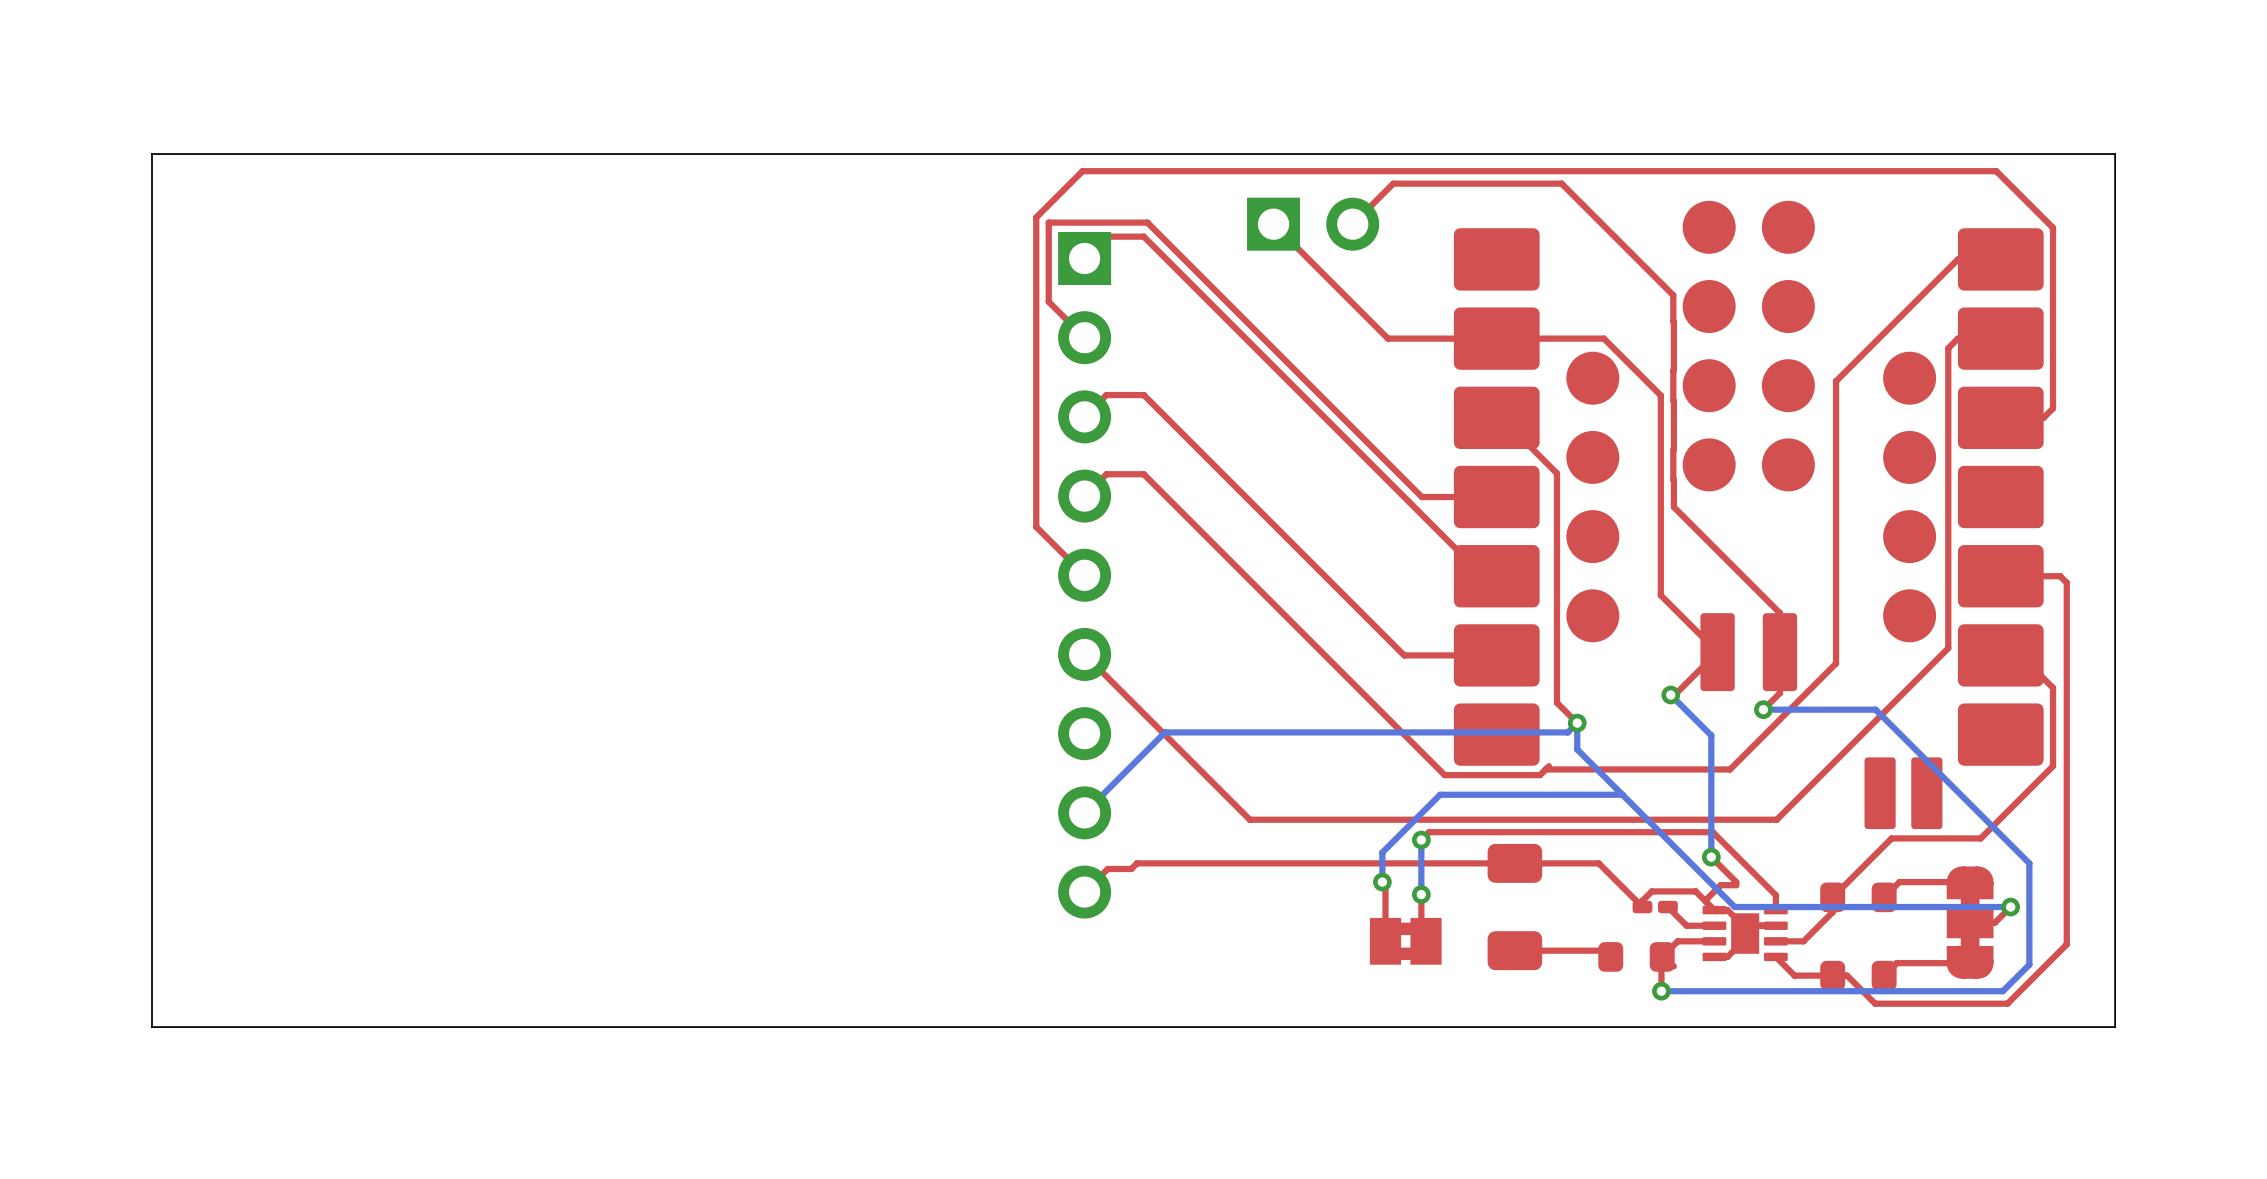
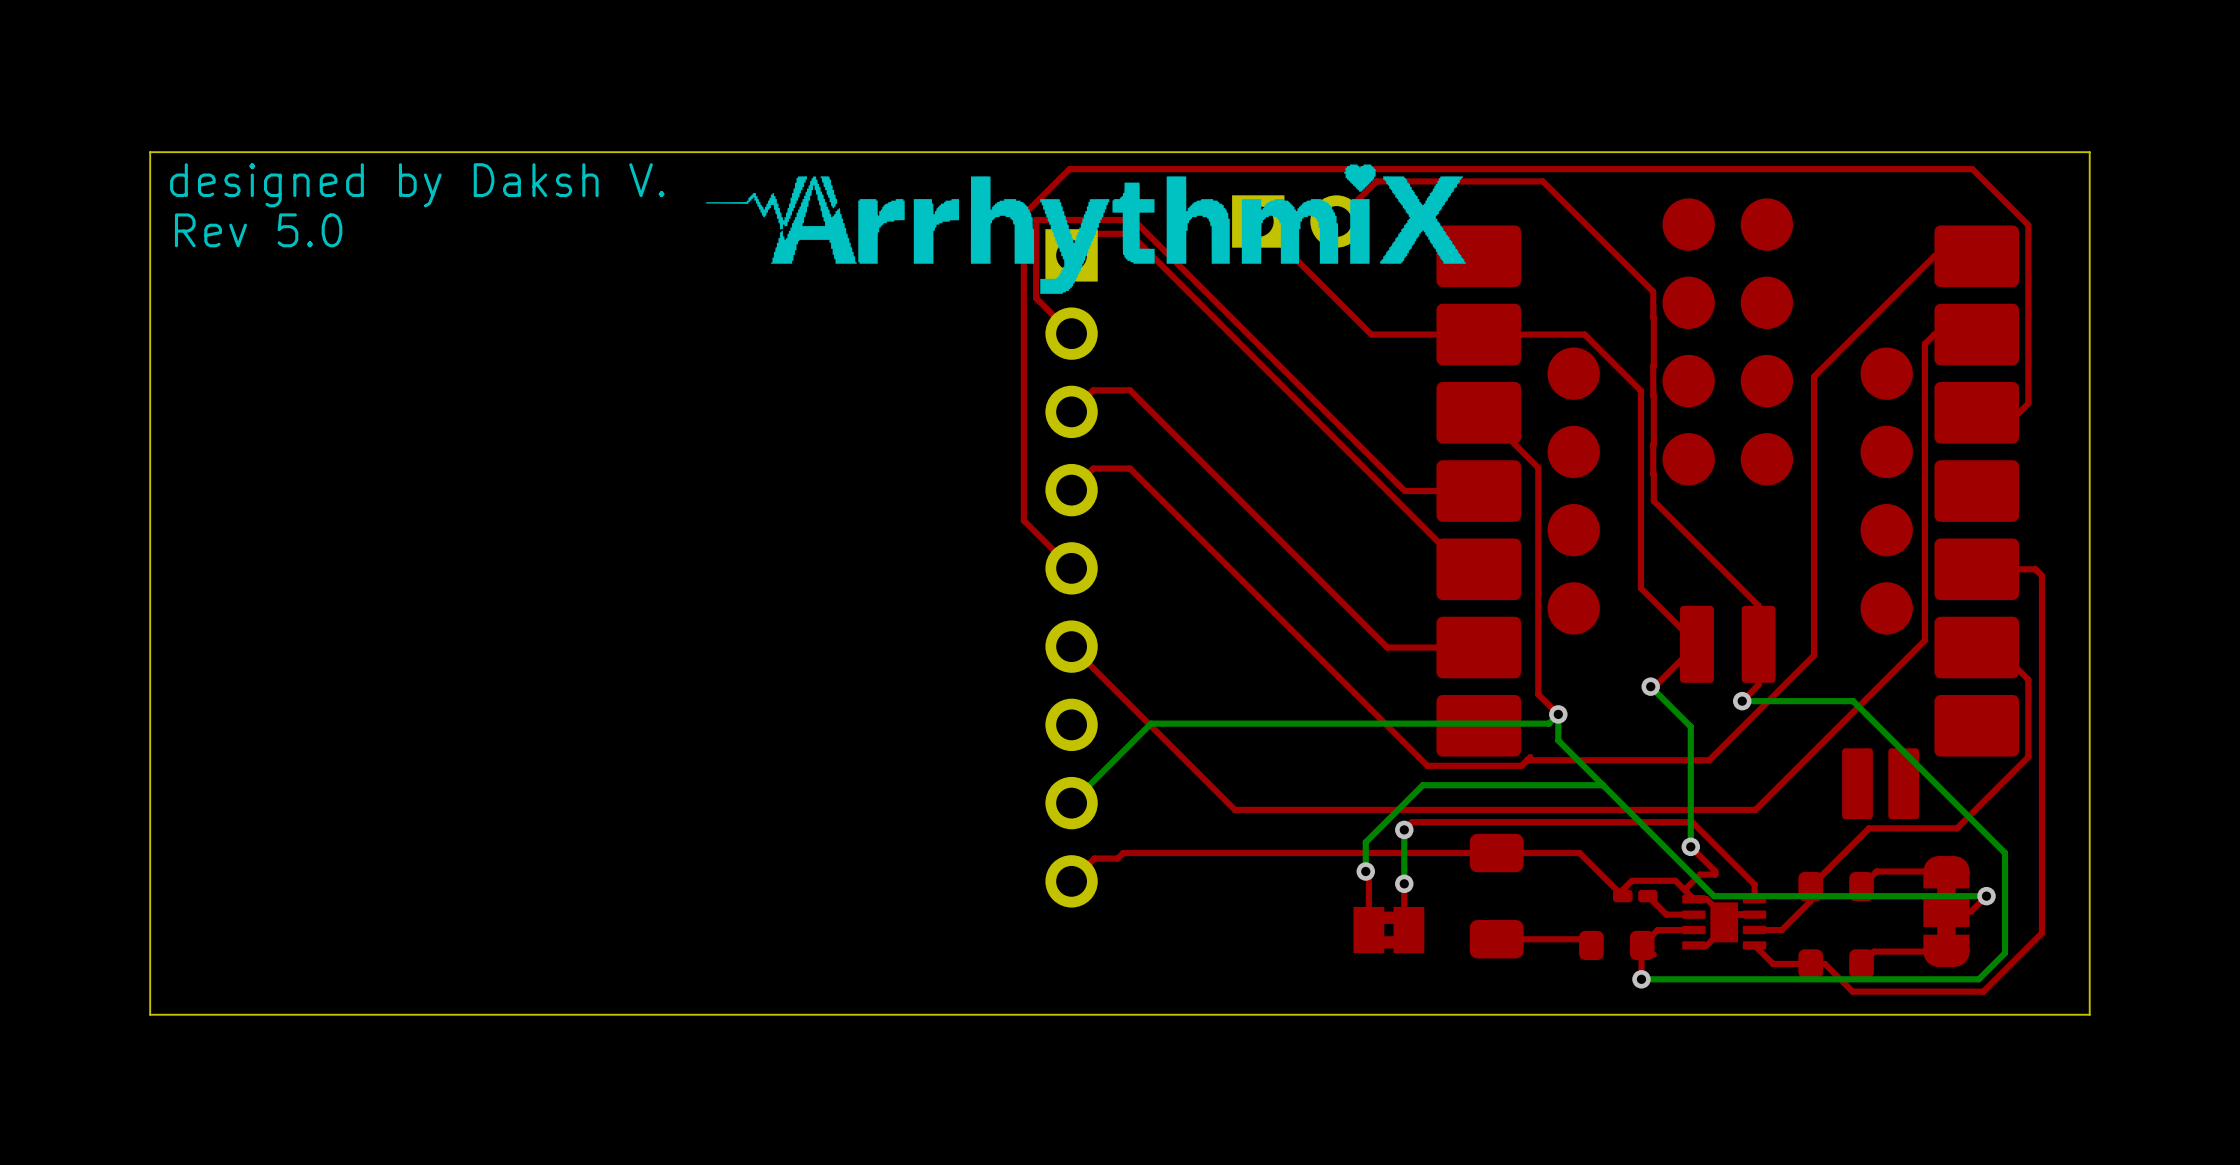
drawing: none -> [706, 164, 1466, 294]
text: none -> designed by Daksh V. (417, 185)
text: none -> Rev 5.0 (258, 230)

